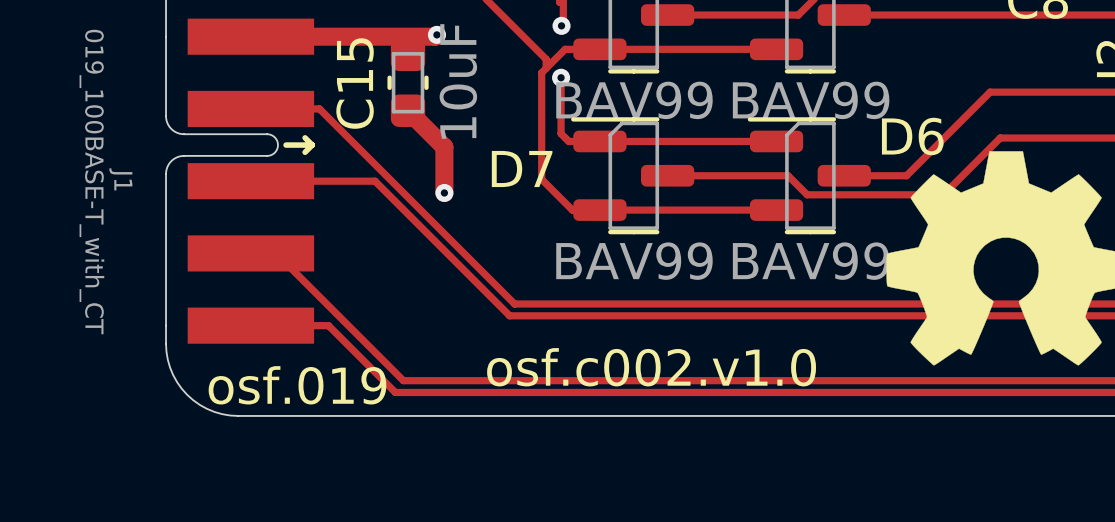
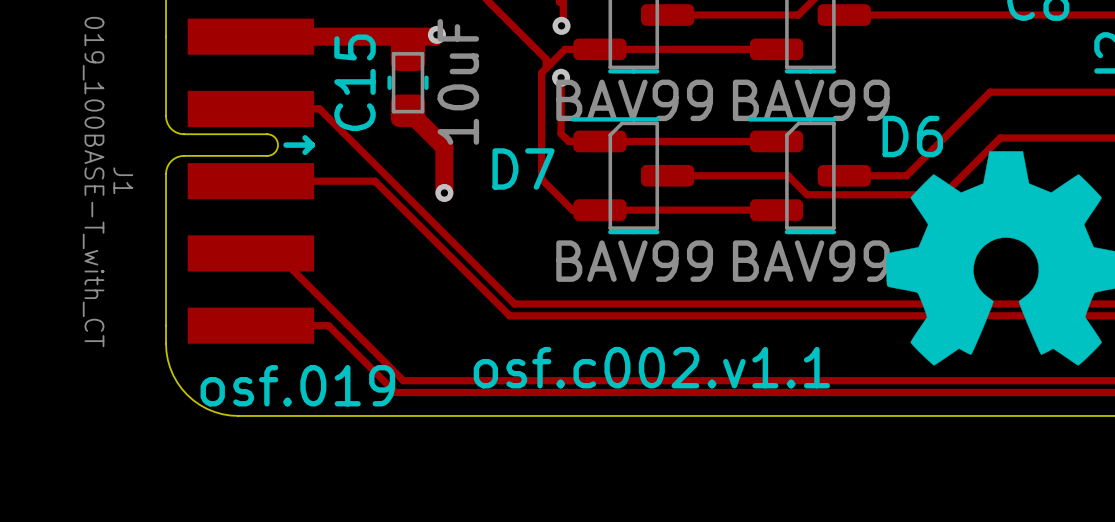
text: osf.c002.v1.0 (651, 367) -> osf.c002.v1.1 (651, 367)

